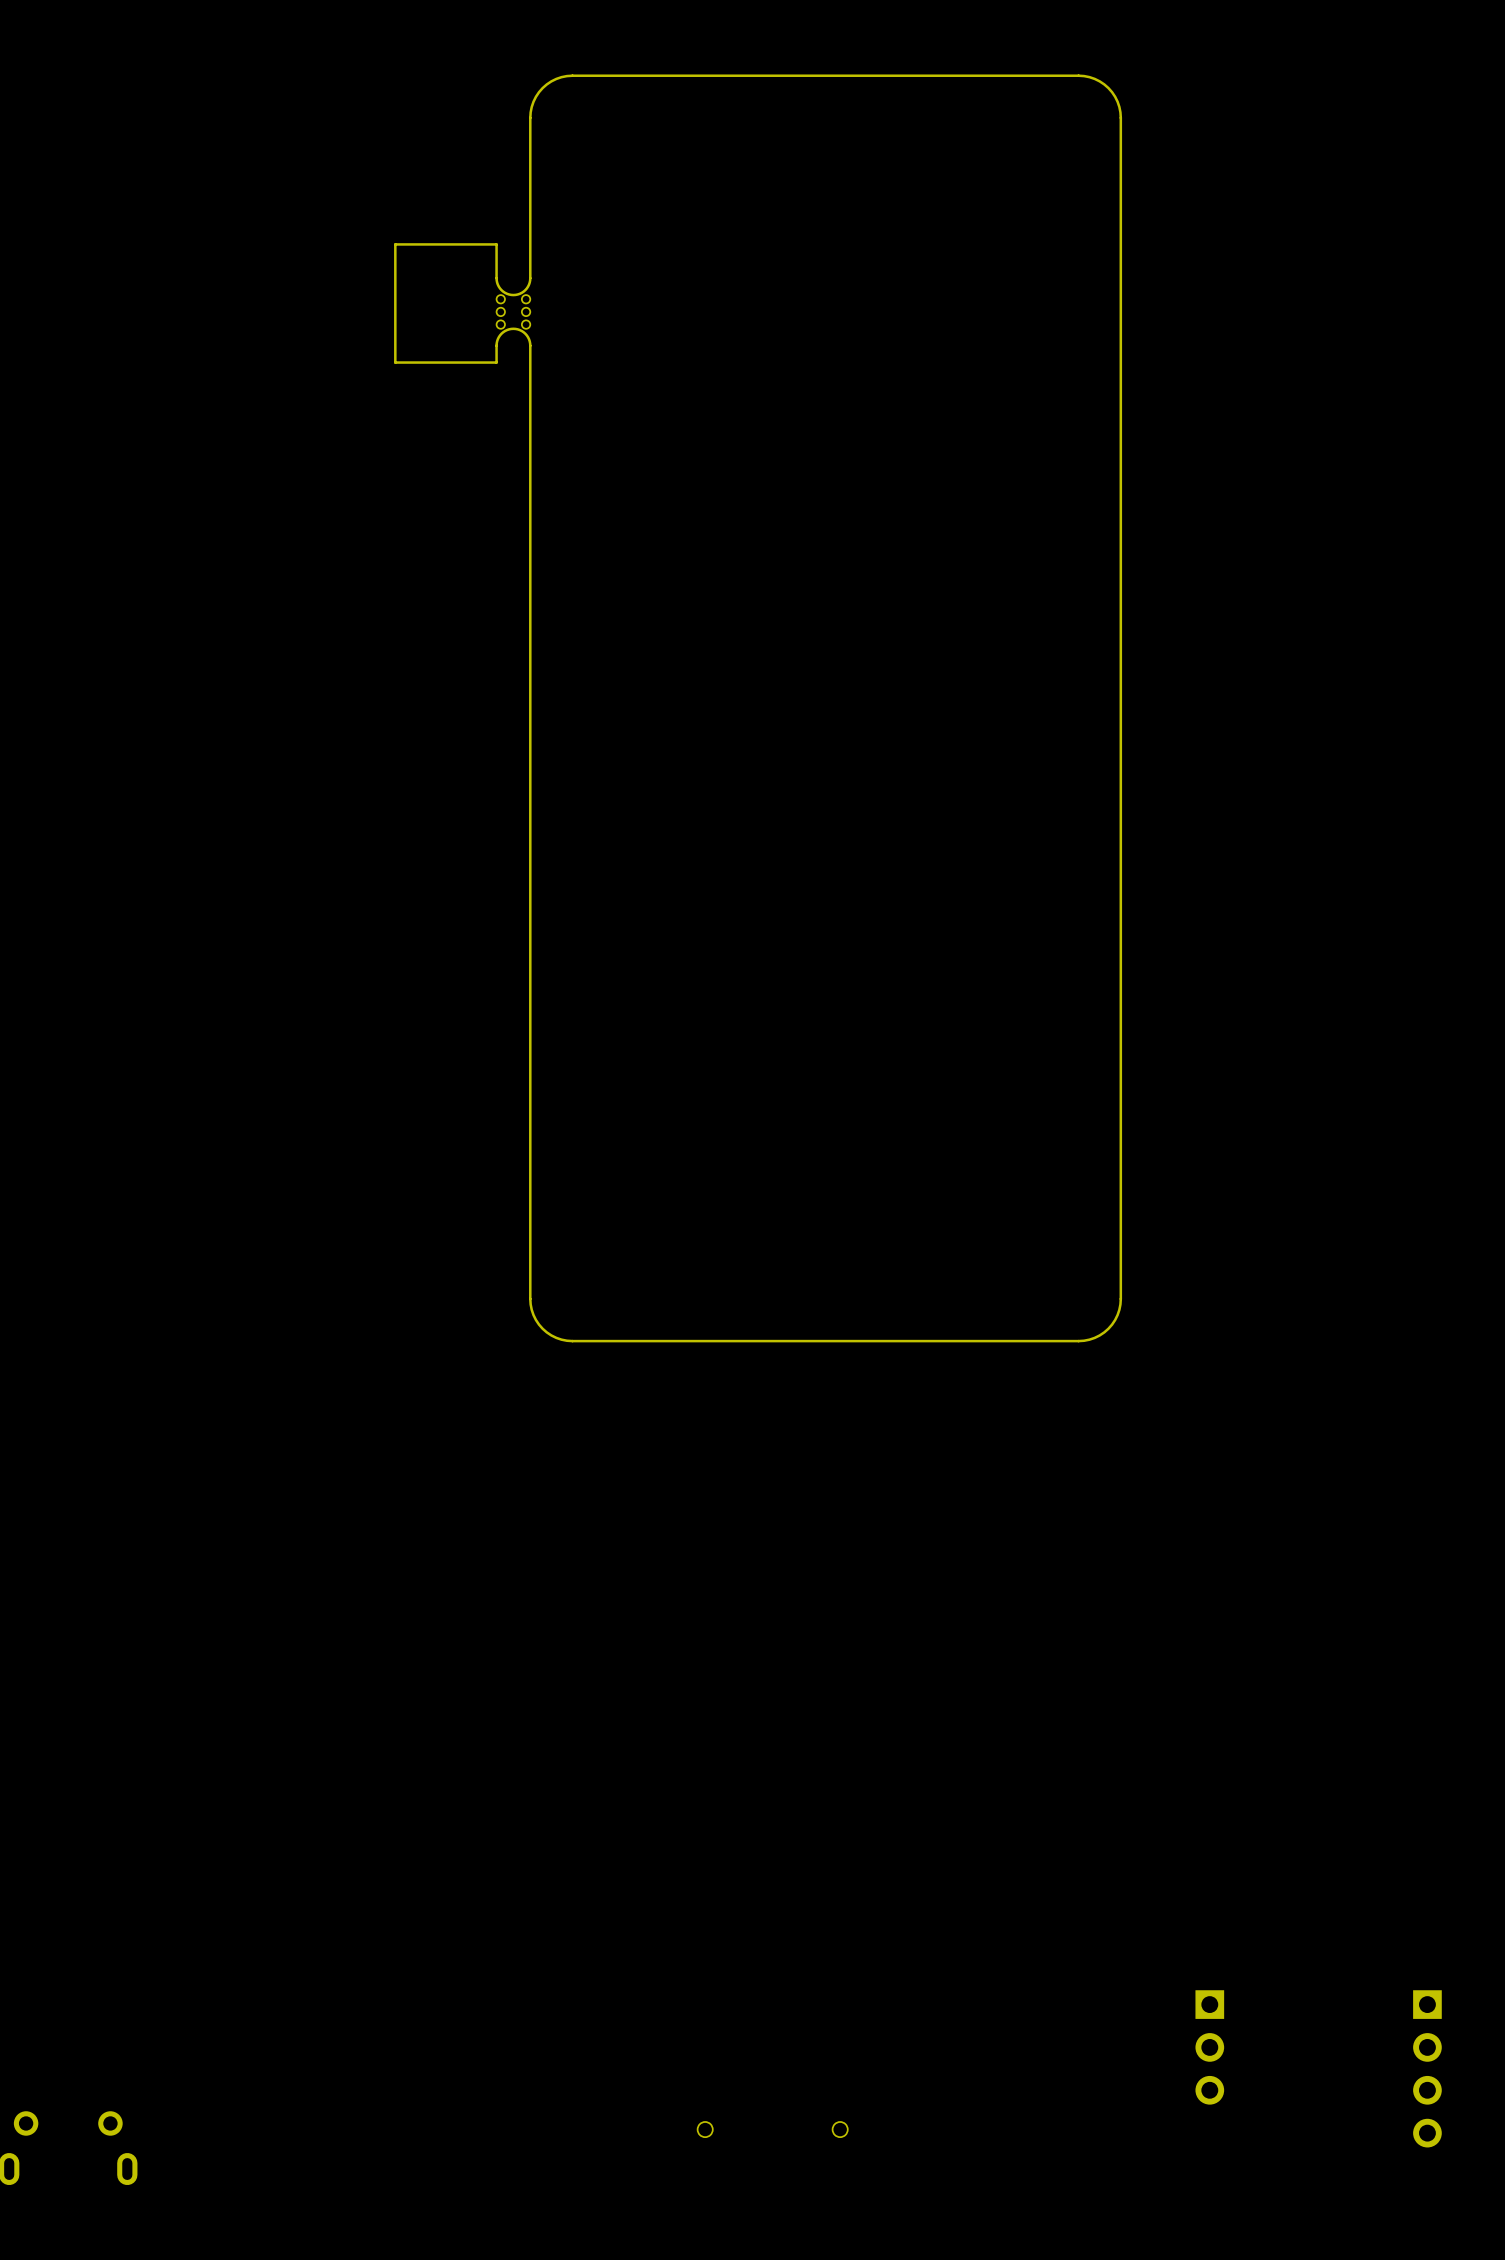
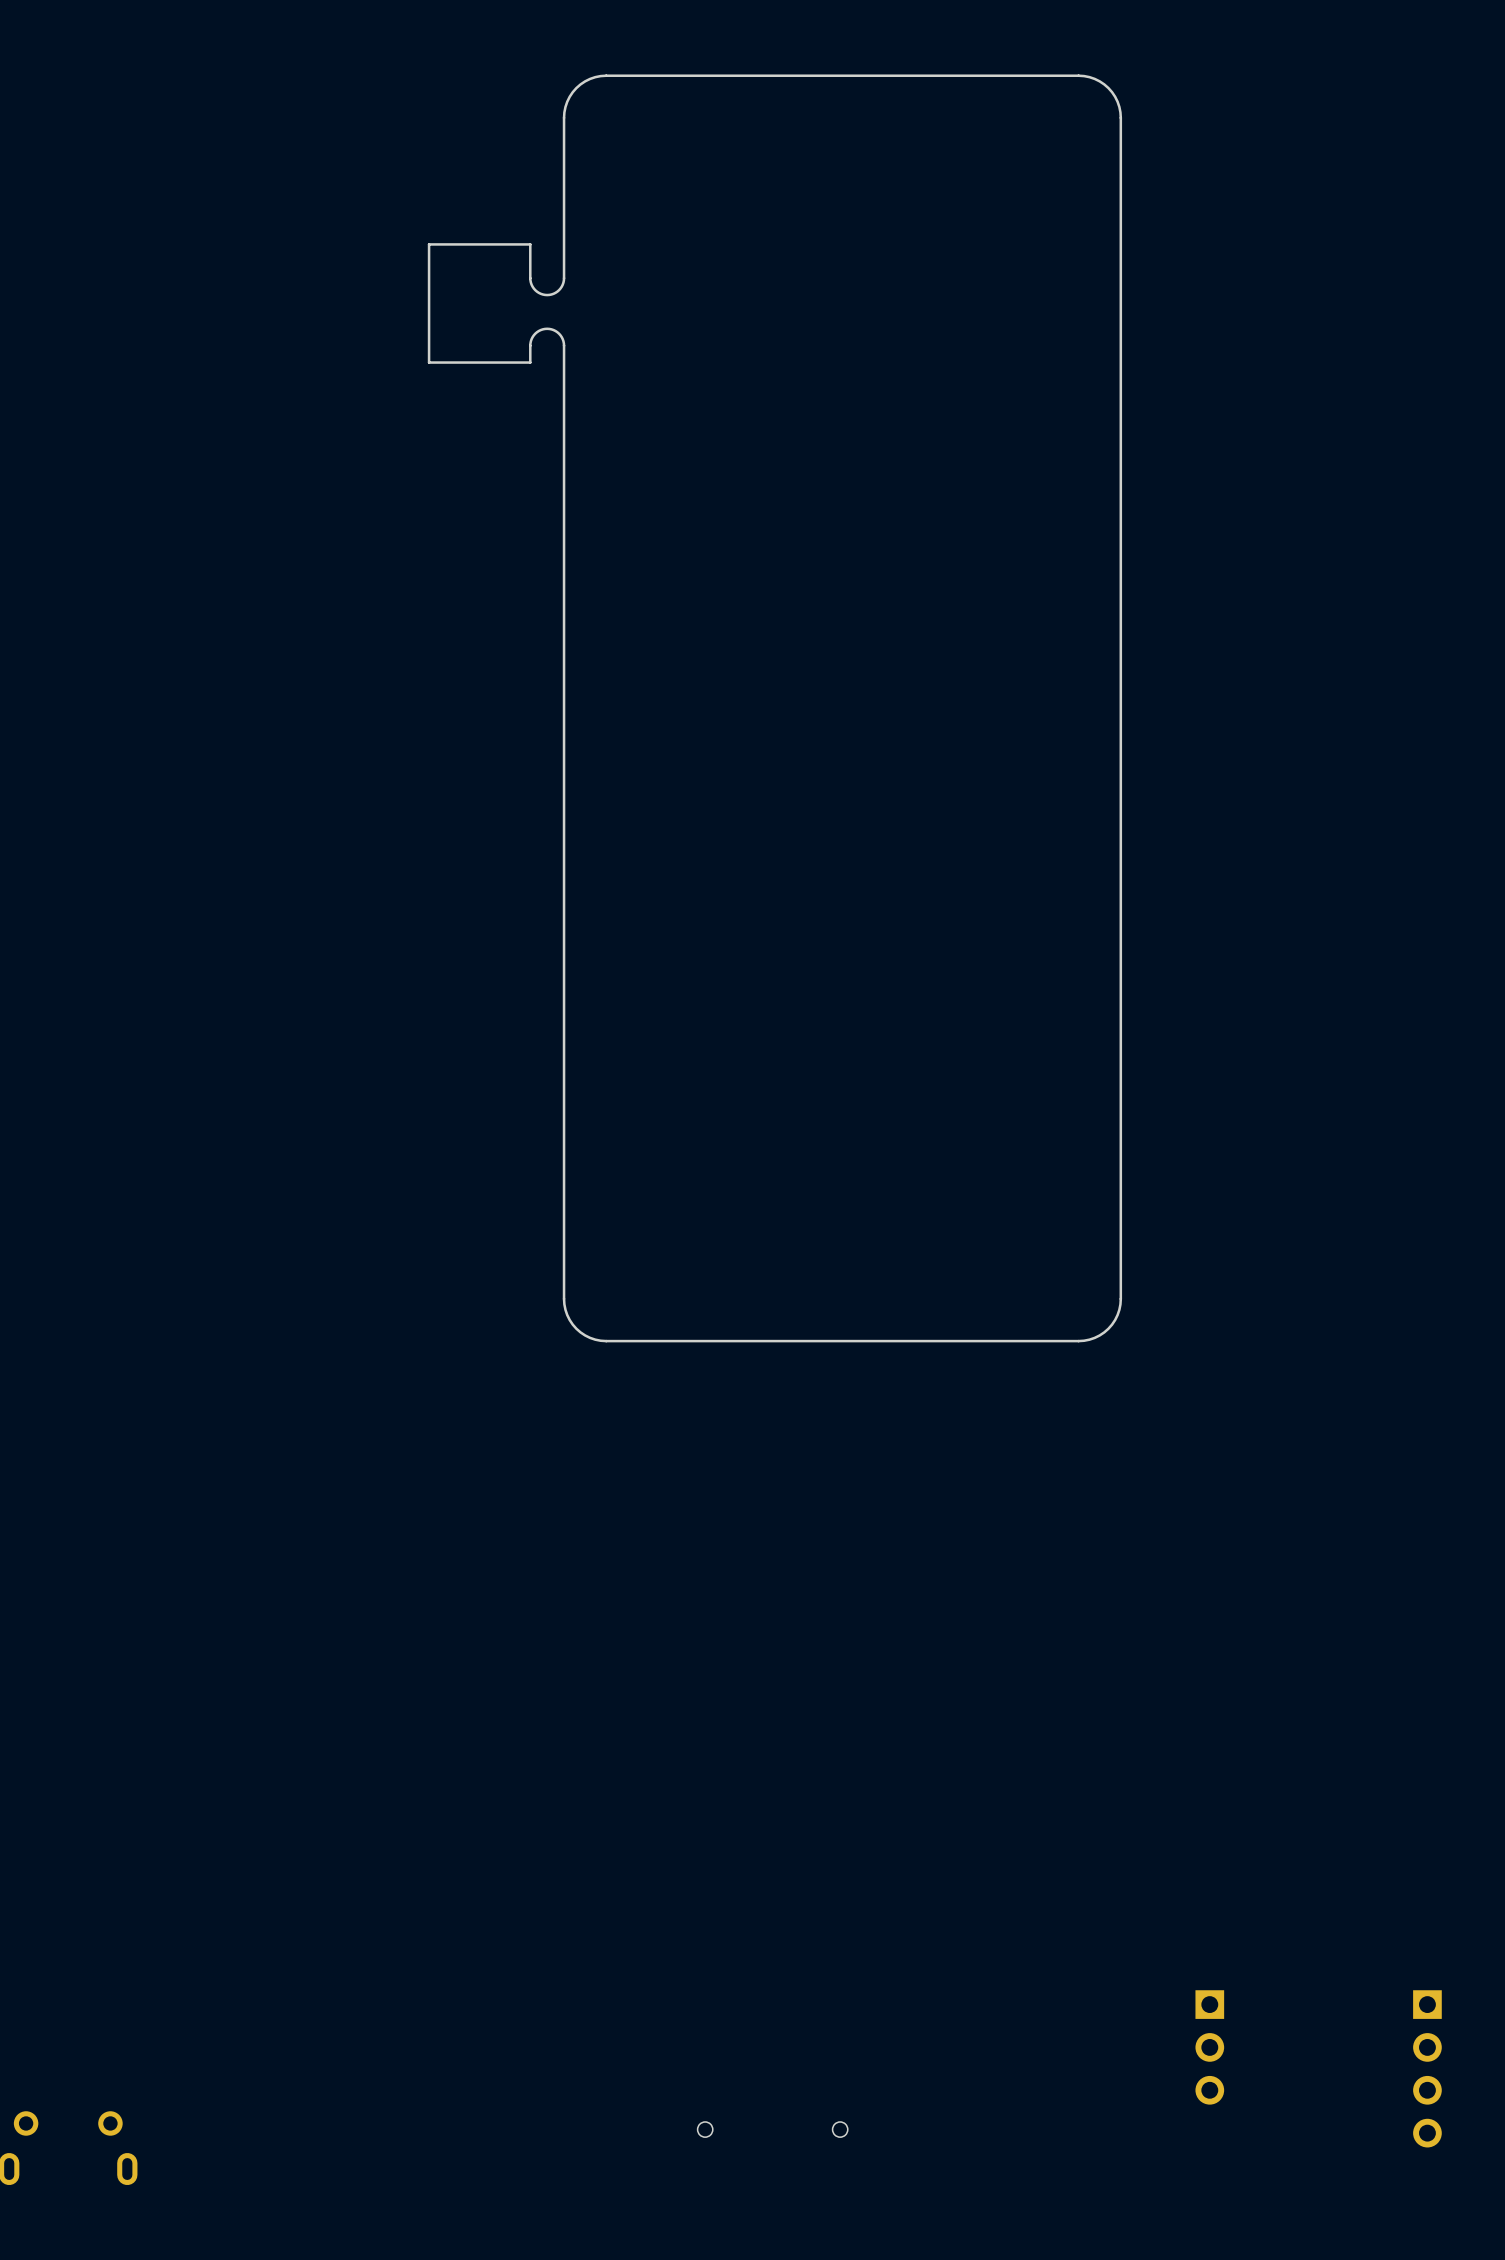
board edge: (606, 75) (572, 75) (556, 78) (542, 88) (533, 101) (530, 117) (530, 244) -> (606, 75) (595, 77) (580, 84) (572, 92) (565, 106) (562, 284) (555, 292) (544, 294) (535, 290) (530, 278)
board edge: (429, 244) (395, 244) (395, 362) (429, 362) -> (429, 244) (429, 362)
board edge: (496, 244) (496, 280) (501, 290) (511, 294) (519, 293) (528, 286) (530, 278) -> (496, 244) (530, 244)
part: (513, 311) -> none
board edge: (530, 345) (528, 337) (521, 331) (513, 328) (504, 331) (497, 341) (496, 362) -> (530, 362) (496, 362)
board edge: (530, 362) (530, 1304) (539, 1324) (556, 1337) (572, 1341) (606, 1341) -> (530, 345) (535, 333) (547, 328) (559, 333) (564, 345) (564, 1304) (569, 1320) (580, 1332) (595, 1339) (606, 1341)

